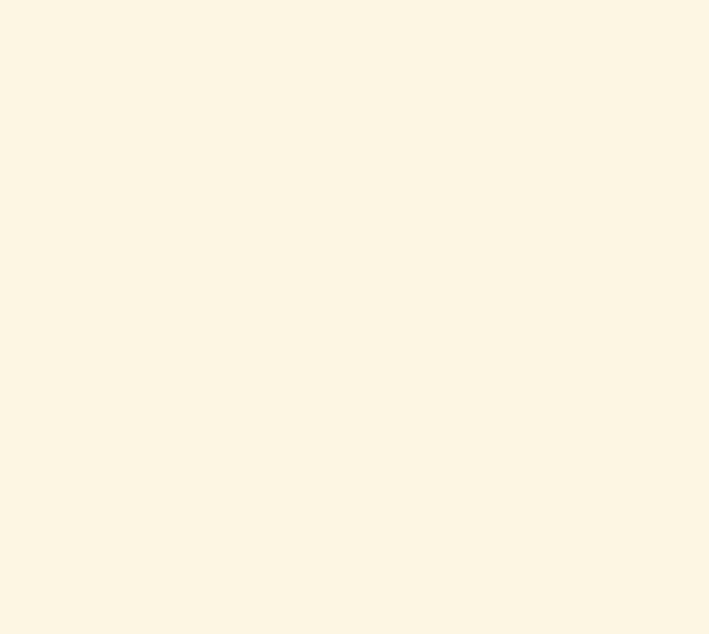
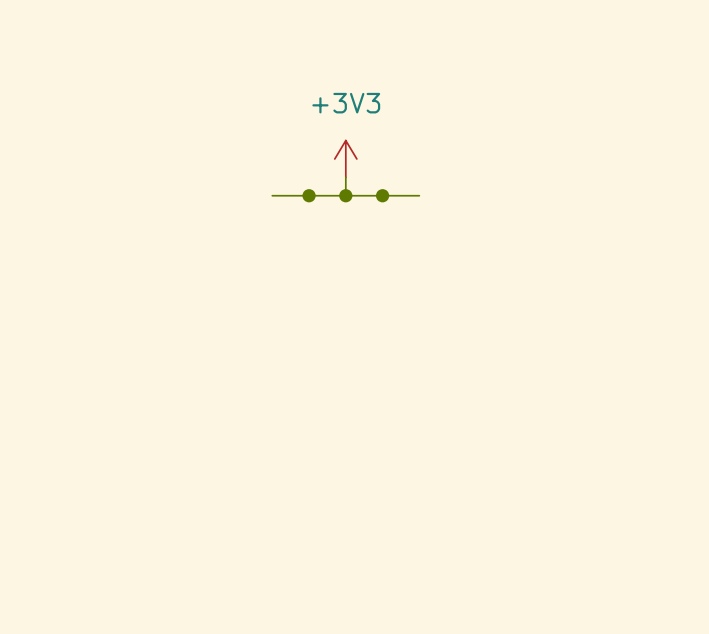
power symbol: none -> +3V3 (345, 158)
wire: none -> (345, 177) (345, 195)
wire: none -> (272, 195) (419, 195)
junction: none -> (309, 195)
junction: none -> (345, 195)
junction: none -> (382, 195)

